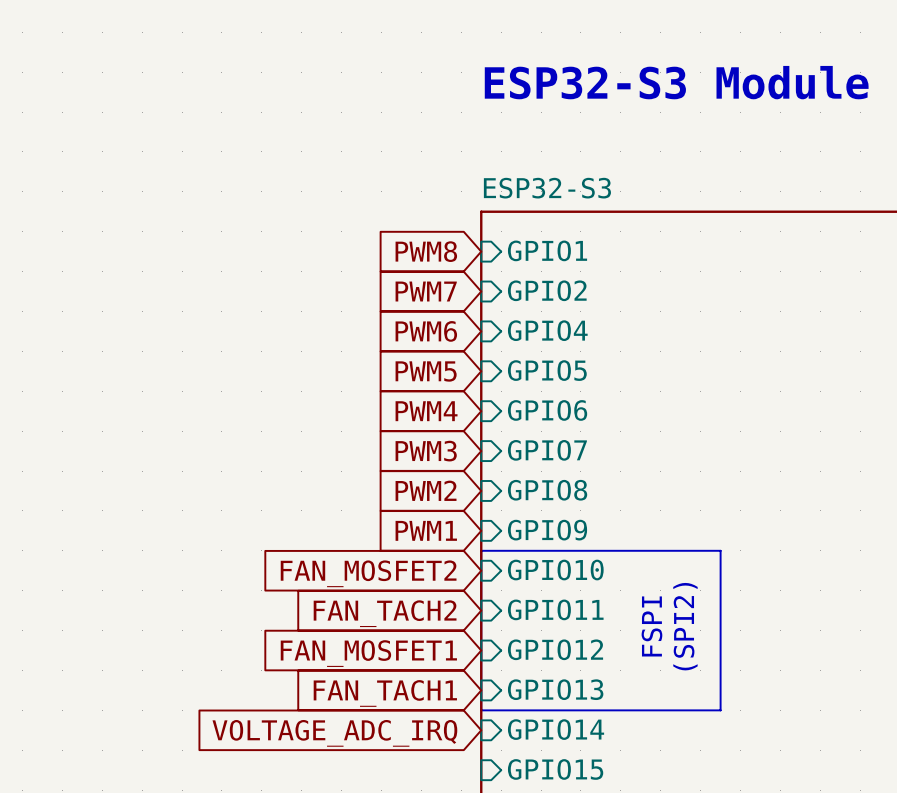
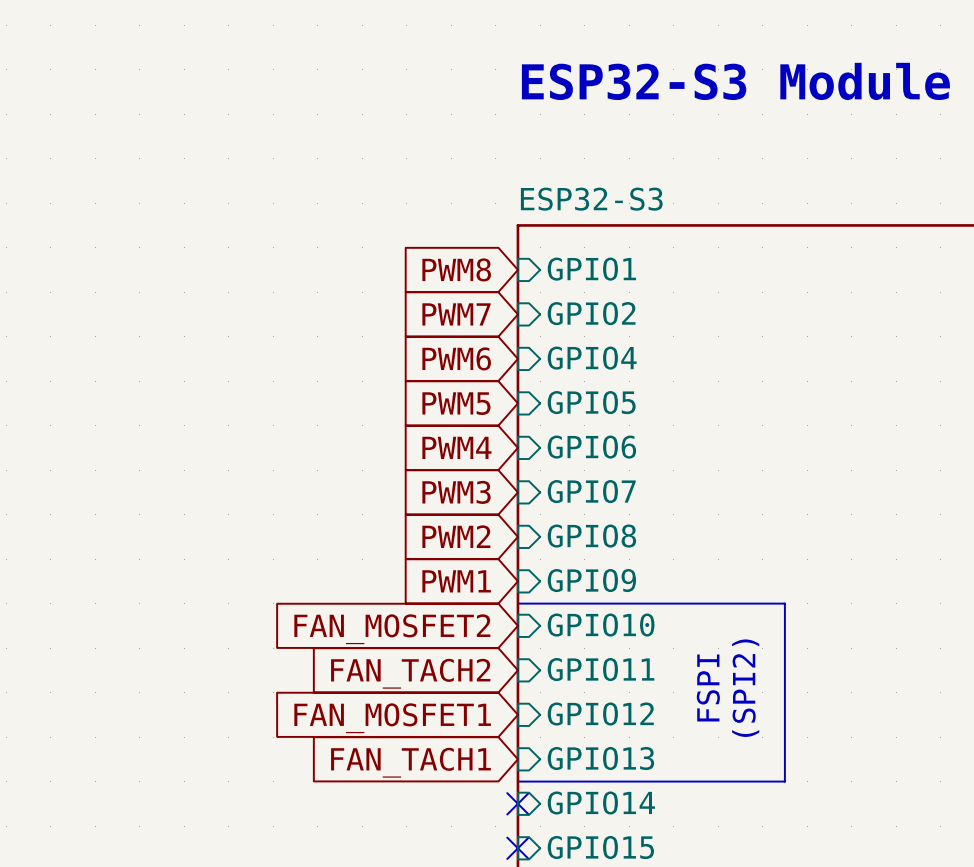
no-connect mark: none -> (517, 803)
global label: VOLTAGE_ADC_IRQ (334, 733) -> none
no-connect mark: none -> (517, 848)

